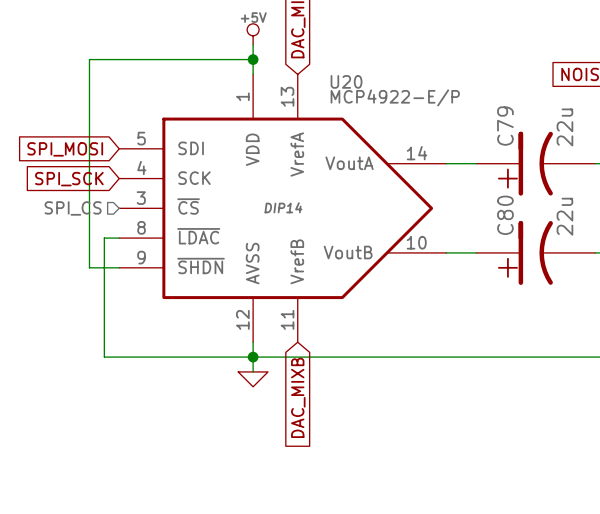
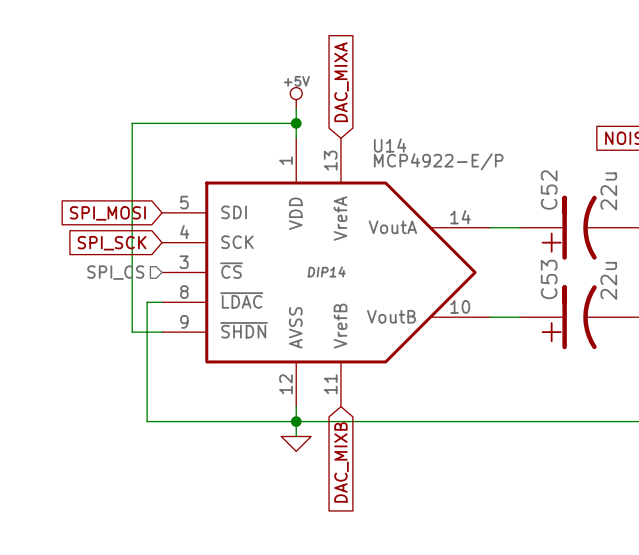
U20 name: U20 (346, 81) -> U14 (390, 145)
C79 name: C79 (505, 126) -> C52 (549, 190)
C80 name: C80 (505, 215) -> C53 (549, 279)

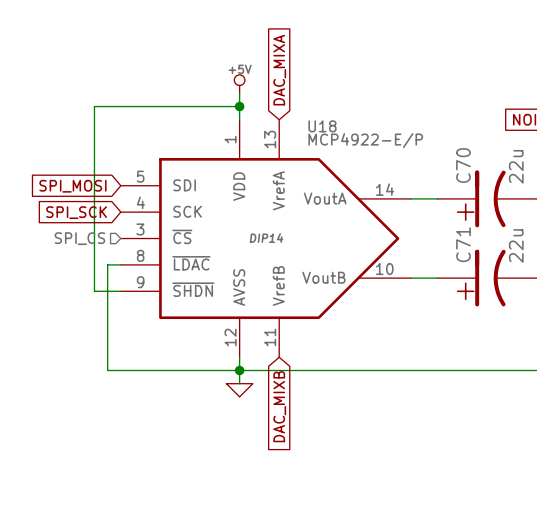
U14 name: U14 (390, 145) -> U18 (322, 126)
C52 name: C52 (549, 190) -> C70 (463, 165)
C53 name: C53 (549, 279) -> C71 (463, 244)

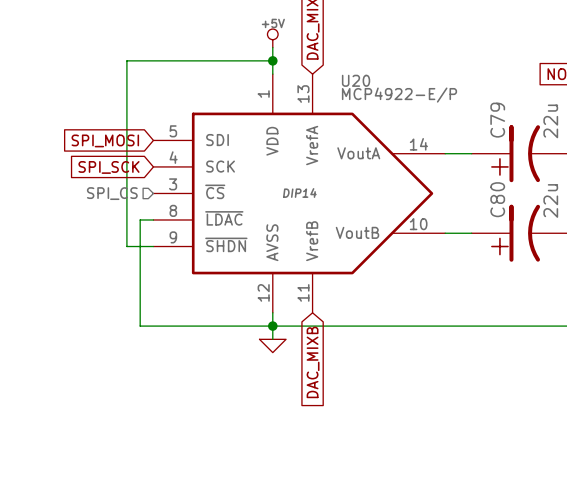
U18 name: U18 (322, 126) -> U20 (356, 80)
C70 name: C70 (463, 165) -> C79 (497, 120)
C71 name: C71 (463, 244) -> C80 (497, 199)

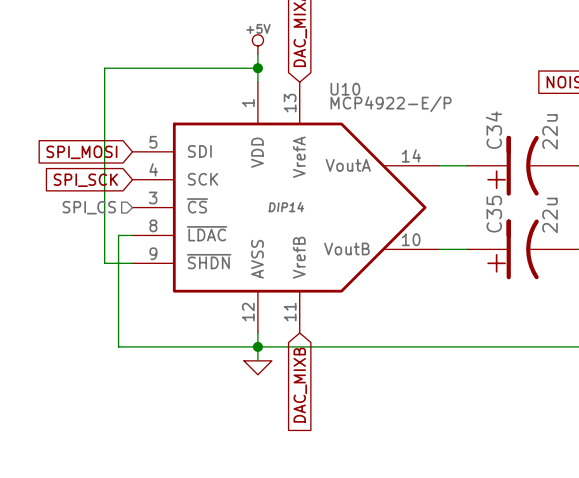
U20 name: U20 (356, 80) -> U10 (345, 89)
C79 name: C79 (497, 120) -> C34 (493, 130)
C80 name: C80 (497, 199) -> C35 (494, 214)

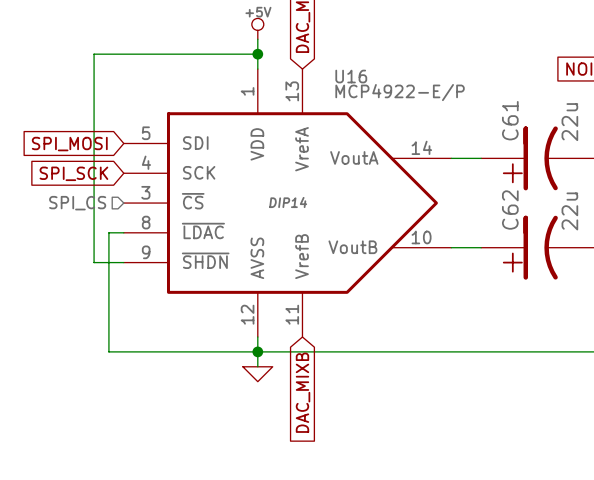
U10 name: U10 (345, 89) -> U16 (351, 76)
C34 name: C34 (493, 130) -> C61 (510, 120)
C35 name: C35 (494, 214) -> C62 (510, 210)

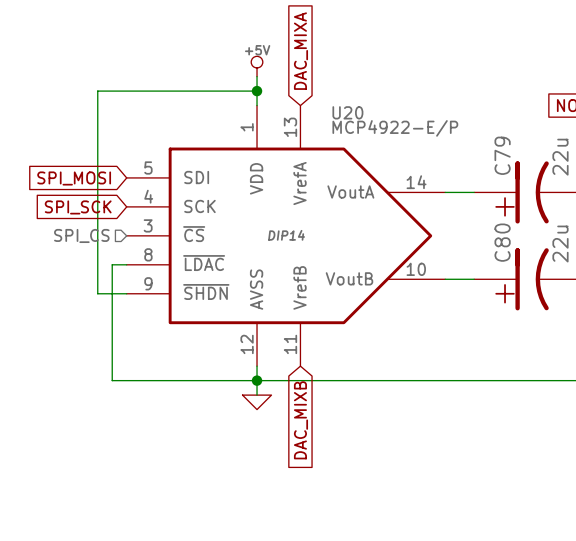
U16 name: U16 (351, 76) -> U20 (347, 112)
C61 name: C61 (510, 120) -> C79 (502, 155)
C62 name: C62 (510, 210) -> C80 (502, 242)

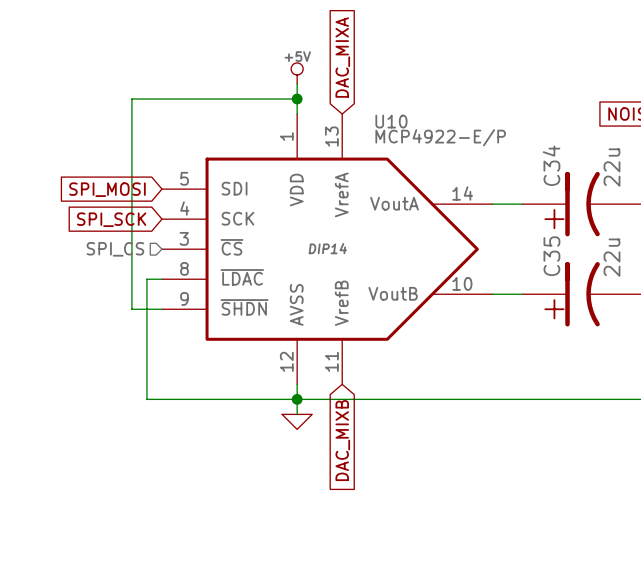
U20 name: U20 (347, 112) -> U10 (391, 121)
C79 name: C79 (502, 155) -> C34 (551, 165)
C80 name: C80 (502, 242) -> C35 (551, 256)

